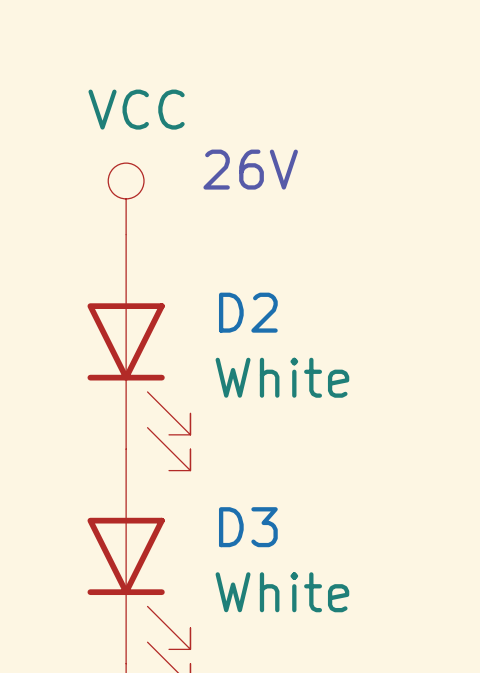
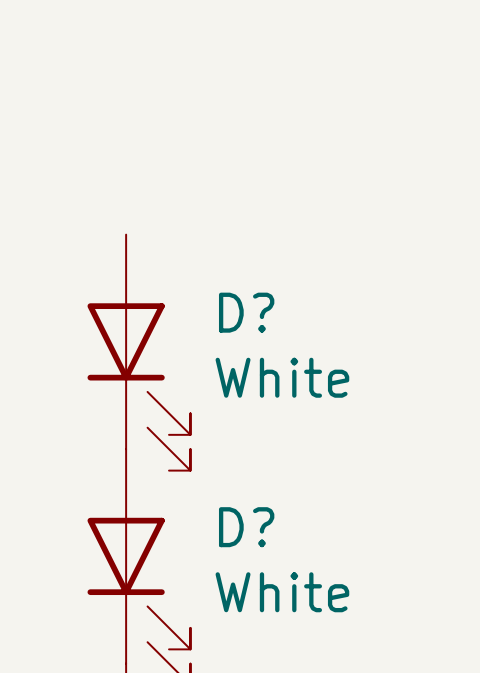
text: 26V (250, 169) -> none
power symbol: VCC (126, 198) -> none
D2 name: D2 (248, 312) -> D? (246, 312)
D3 name: D3 (248, 527) -> D? (246, 527)

